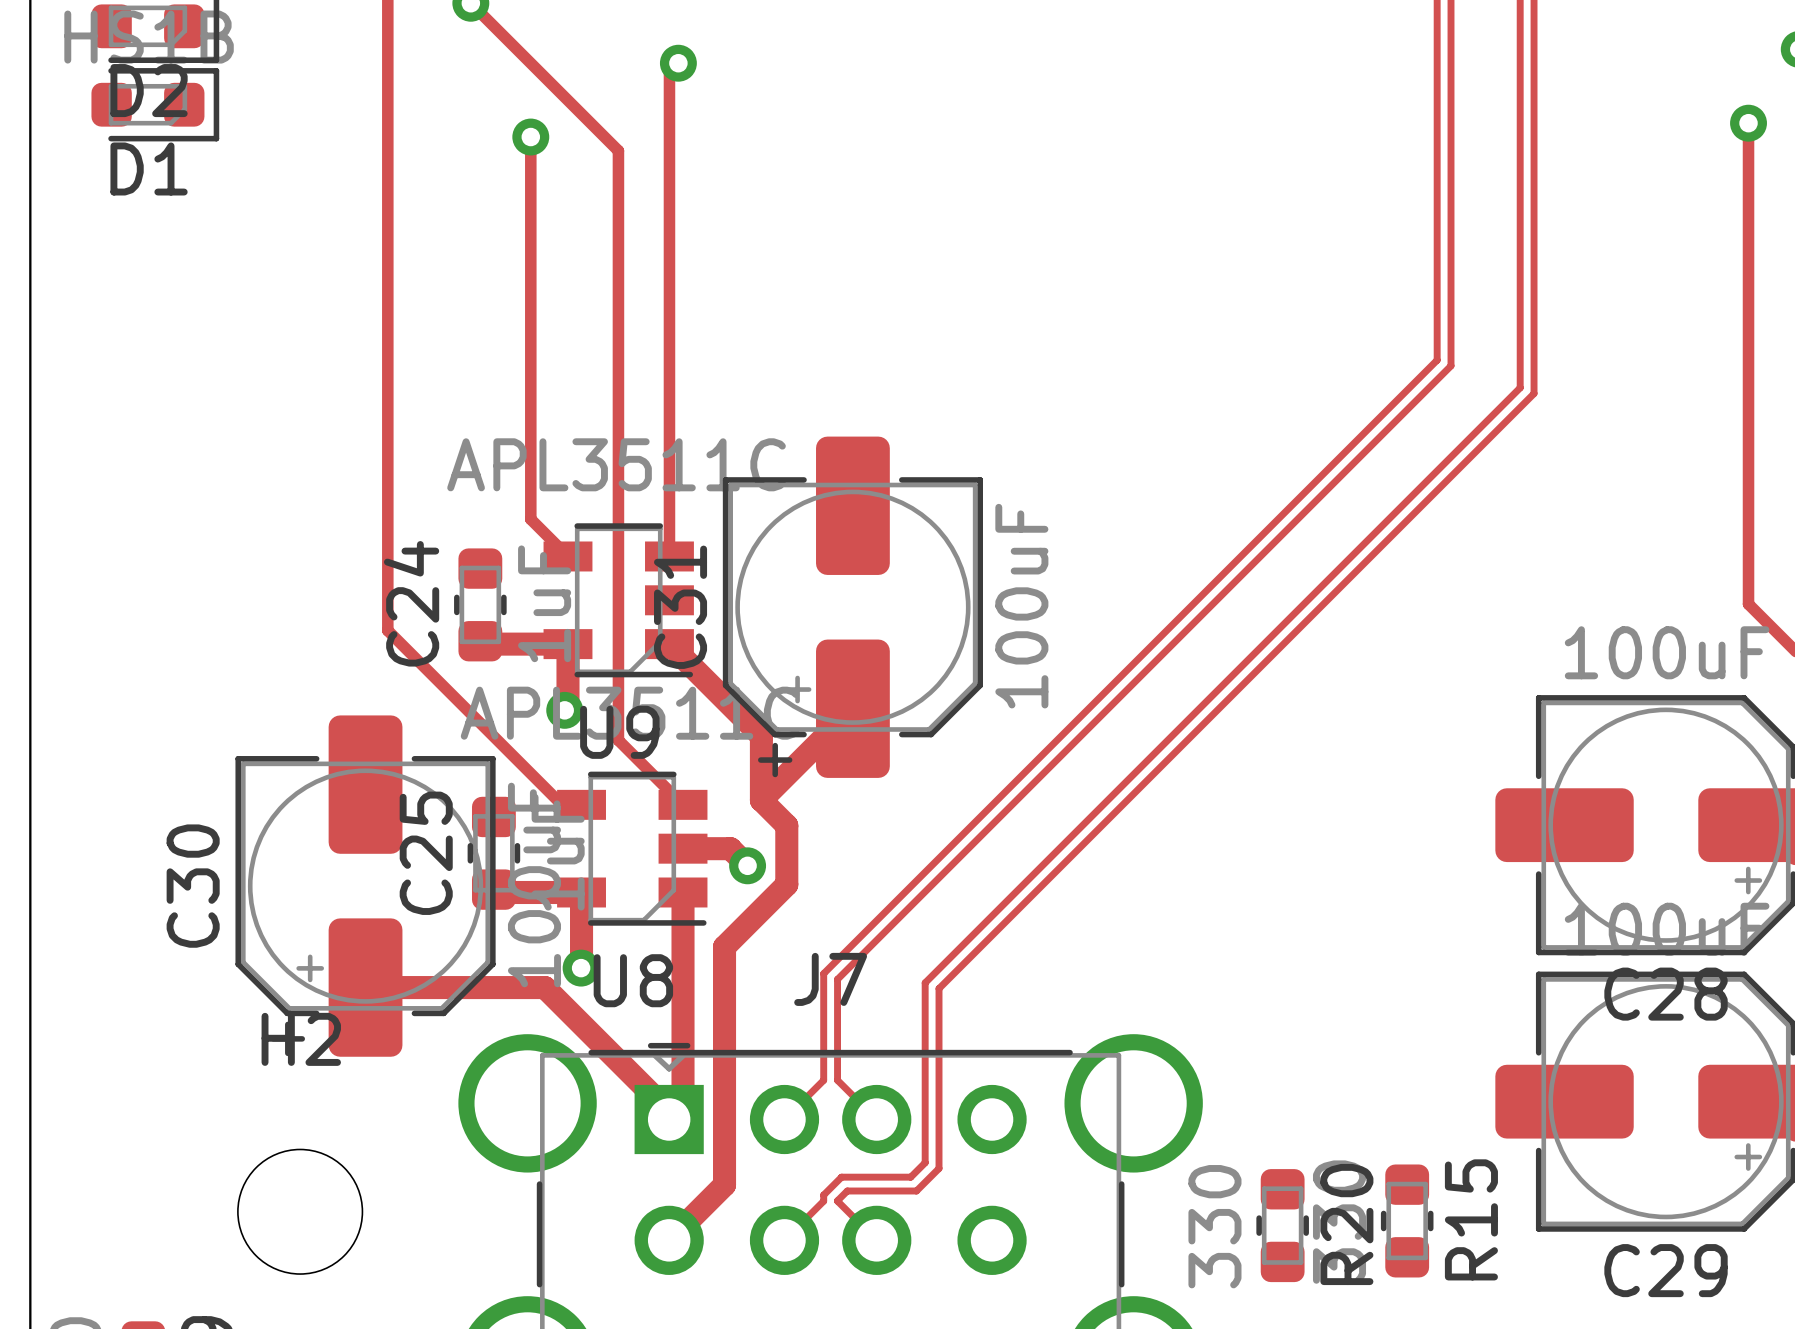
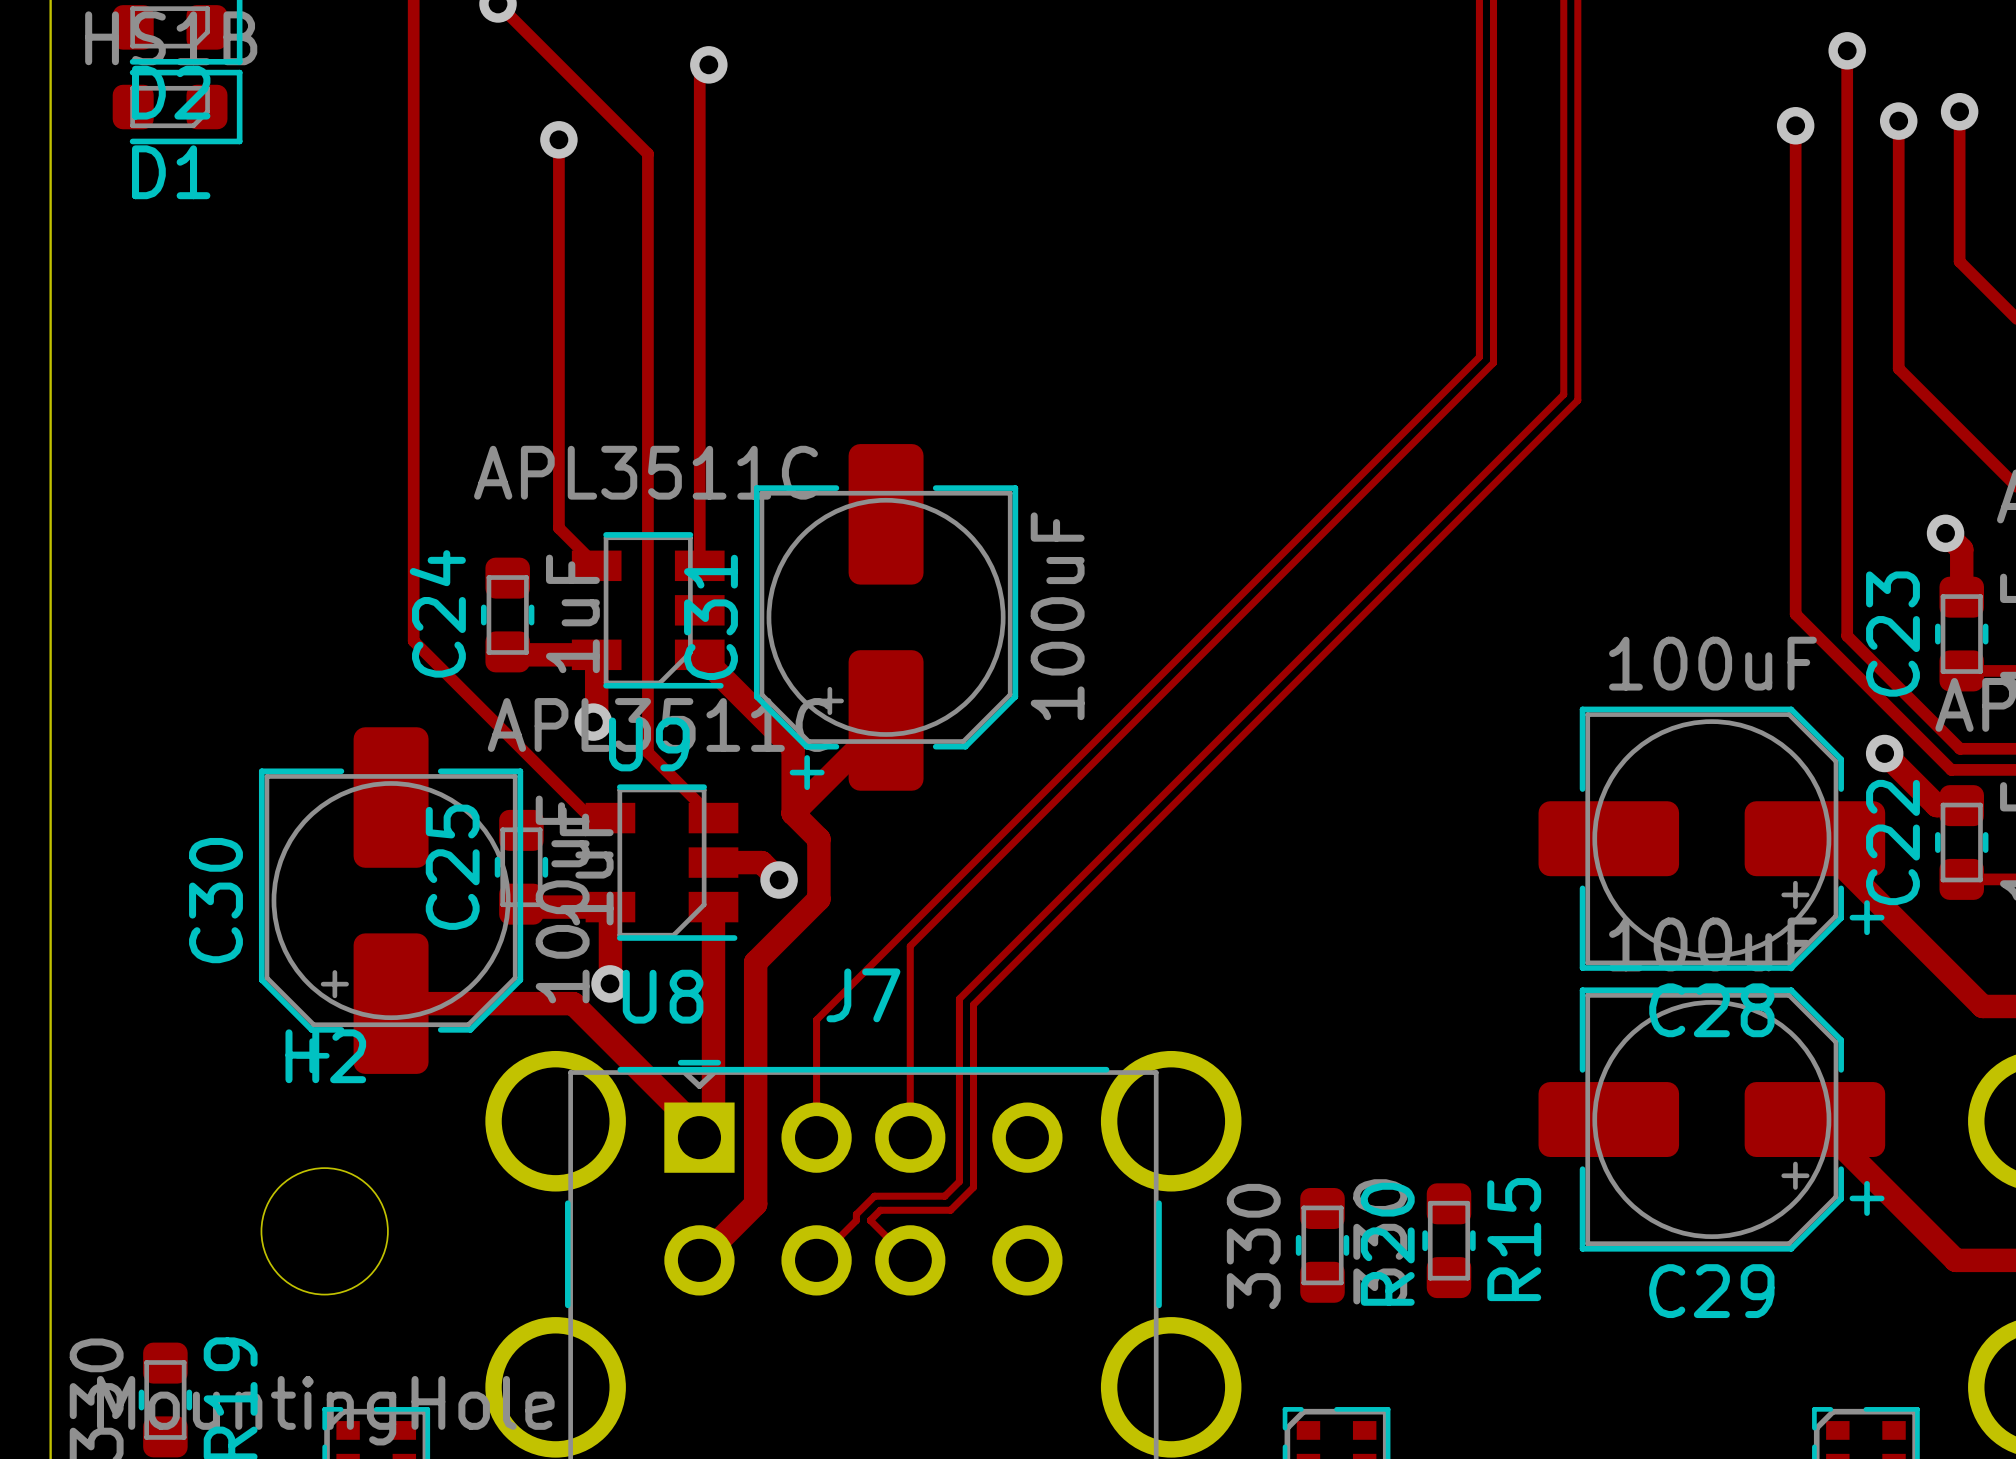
track: (1437, 350) (1437, 360) (823, 973) (823, 1080) (784, 1119) -> (1479, 357) (816, 1019) (816, 1137)
track: (1451, 356) (1451, 365) (837, 979) (837, 1080) (876, 1119) -> (1493, 362) (910, 946) (910, 1137)

